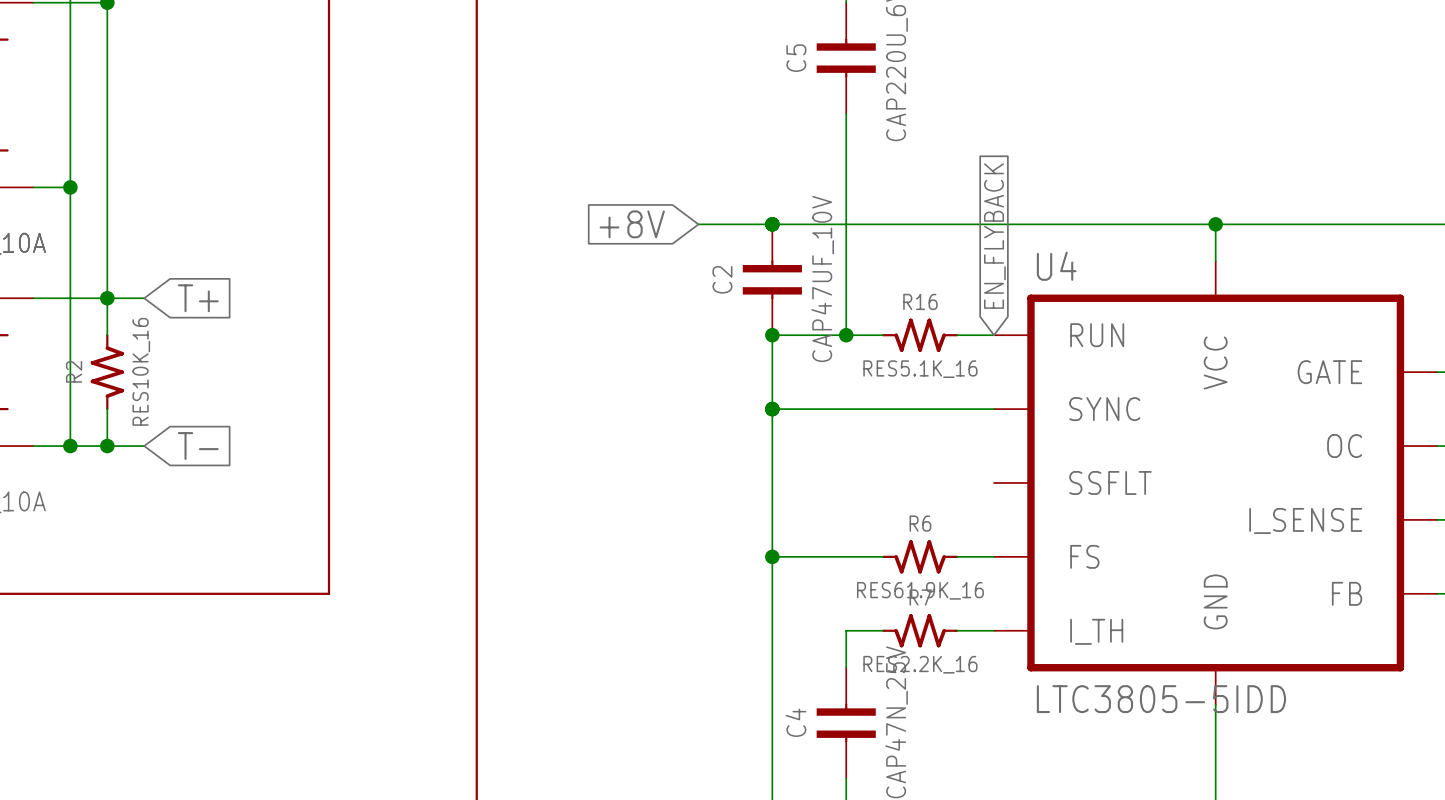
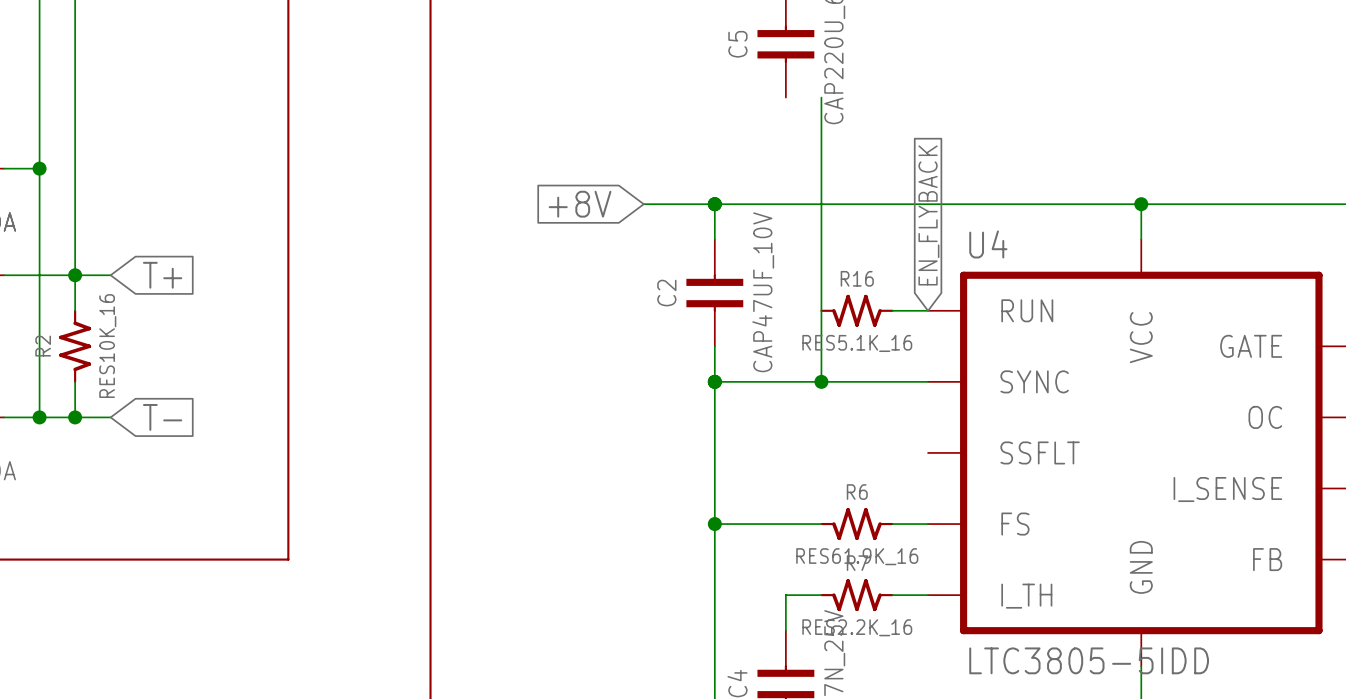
wire: (846, 113) (846, 335) -> none
wire: none -> (821, 97) (821, 381)
C2 position: (772, 279) -> (714, 293)
junction: (772, 335) -> none
junction: (846, 335) -> none
wire: (883, 335) (772, 335) (772, 372) -> none
junction: none -> (821, 381)

